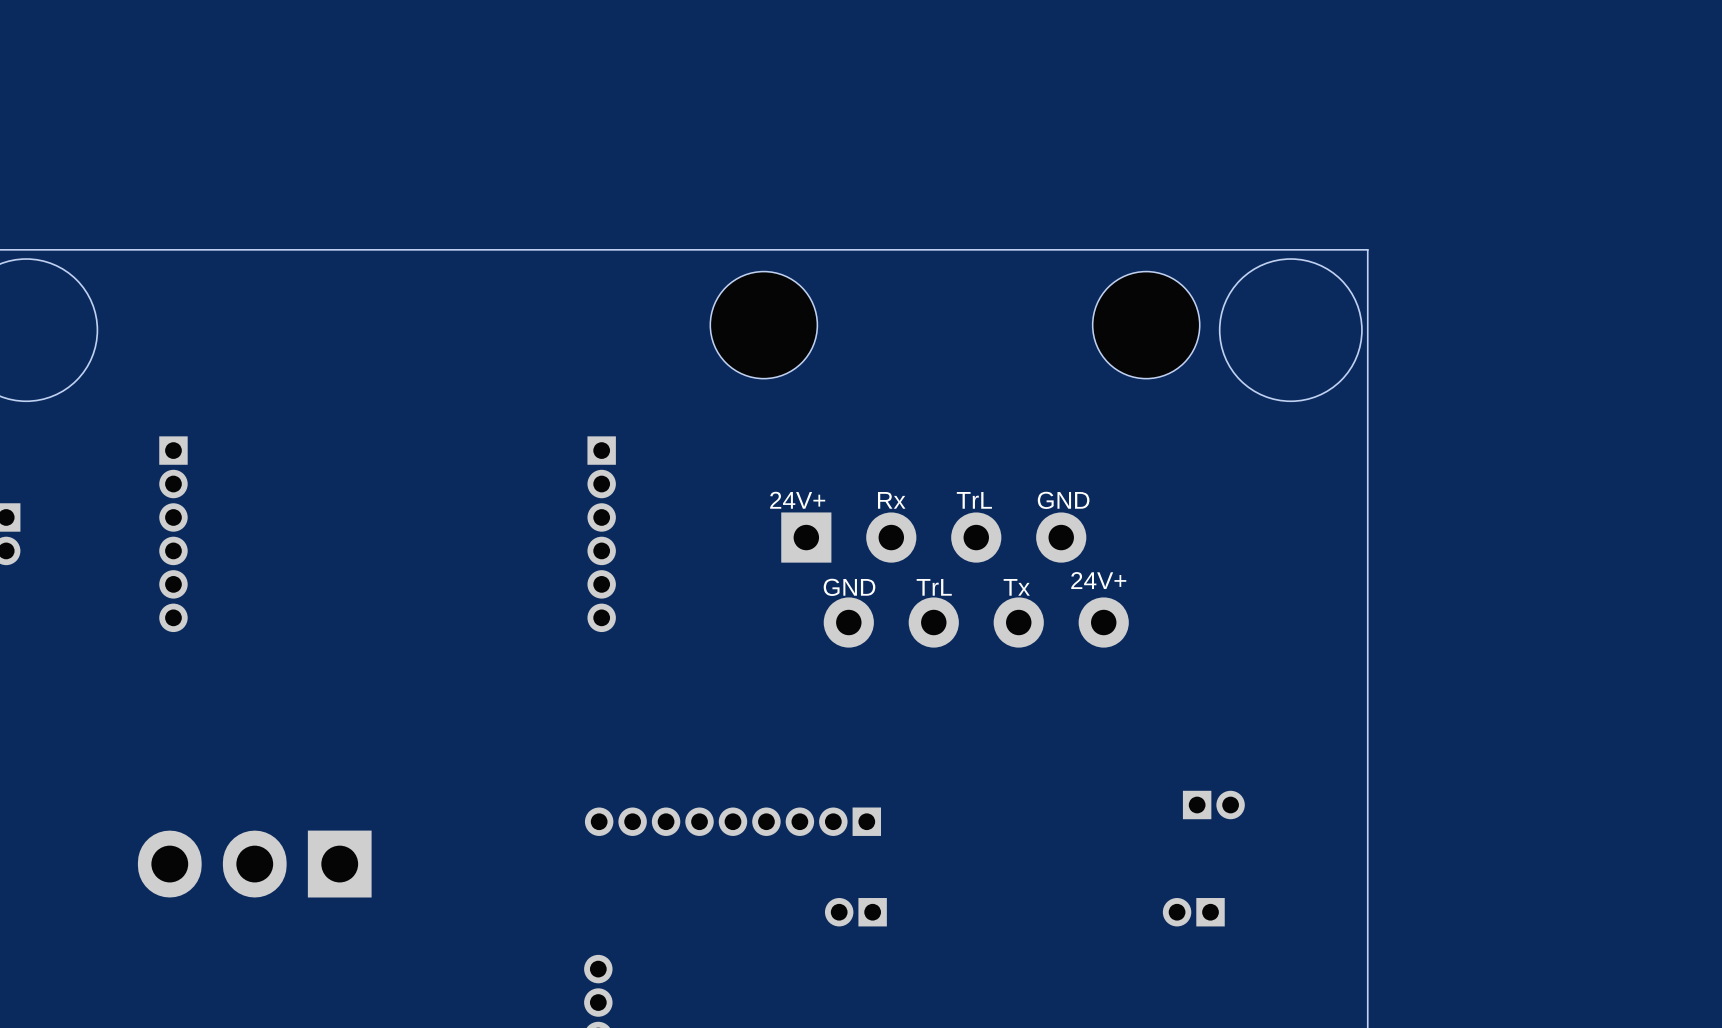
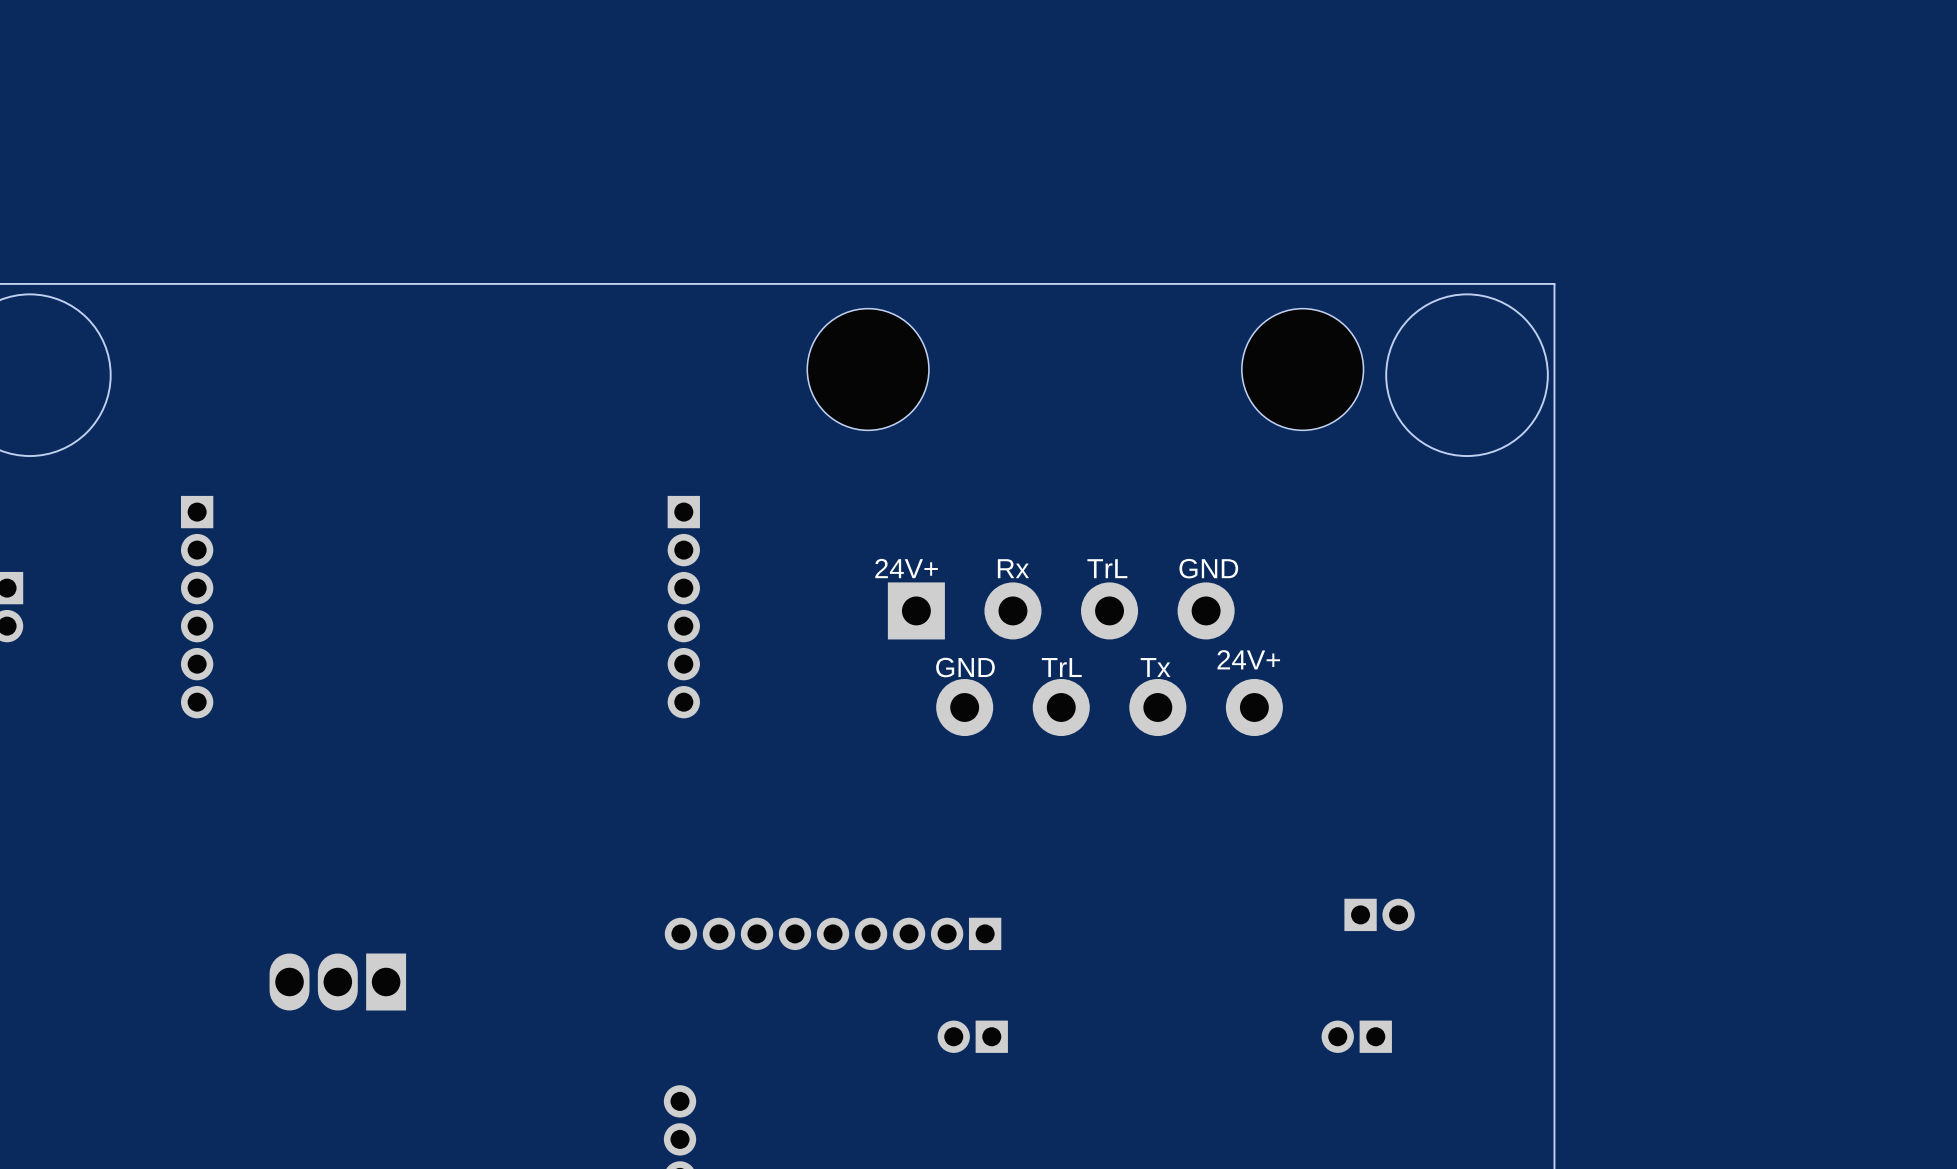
part: (254, 864) -> none
part: none -> (337, 982)

